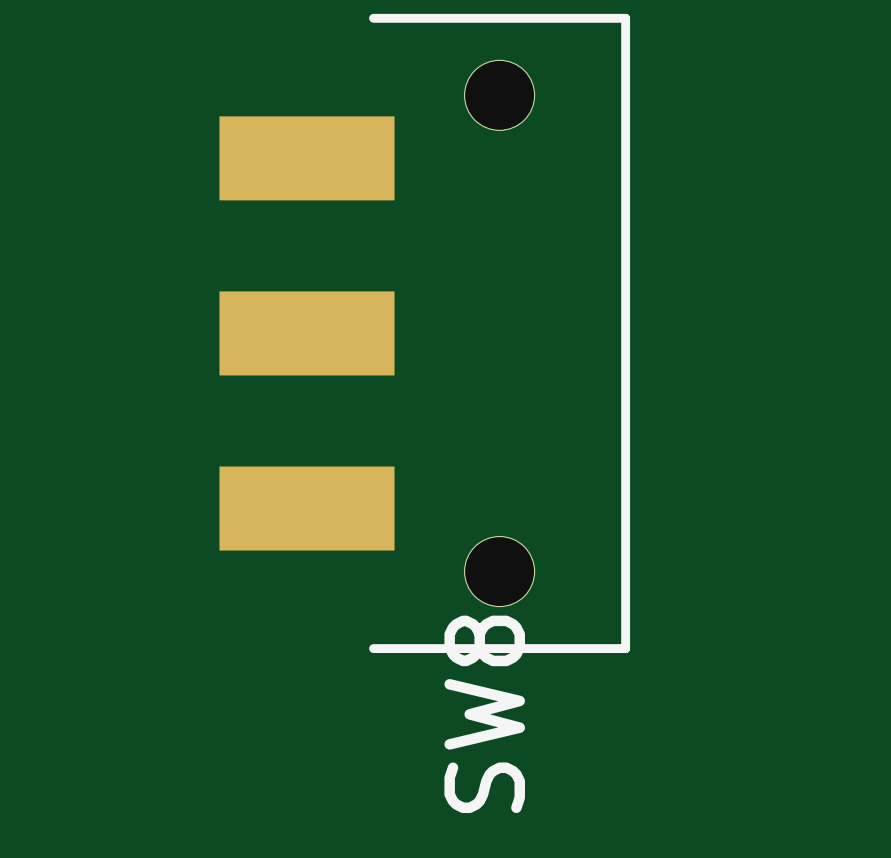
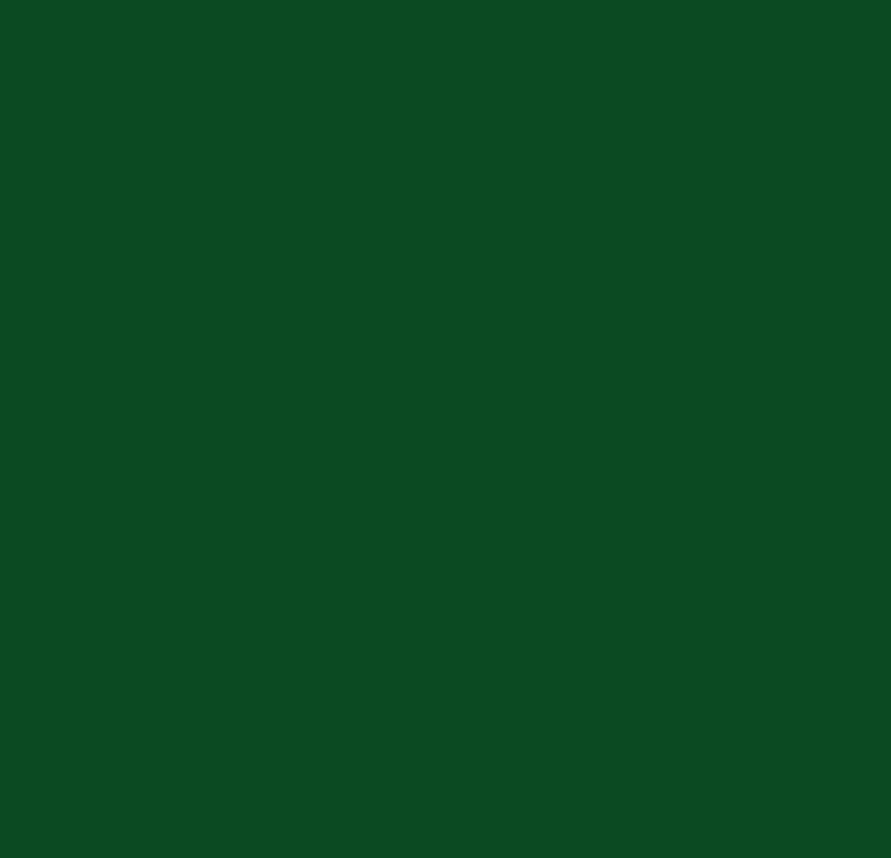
SW8: (424, 333) -> none

